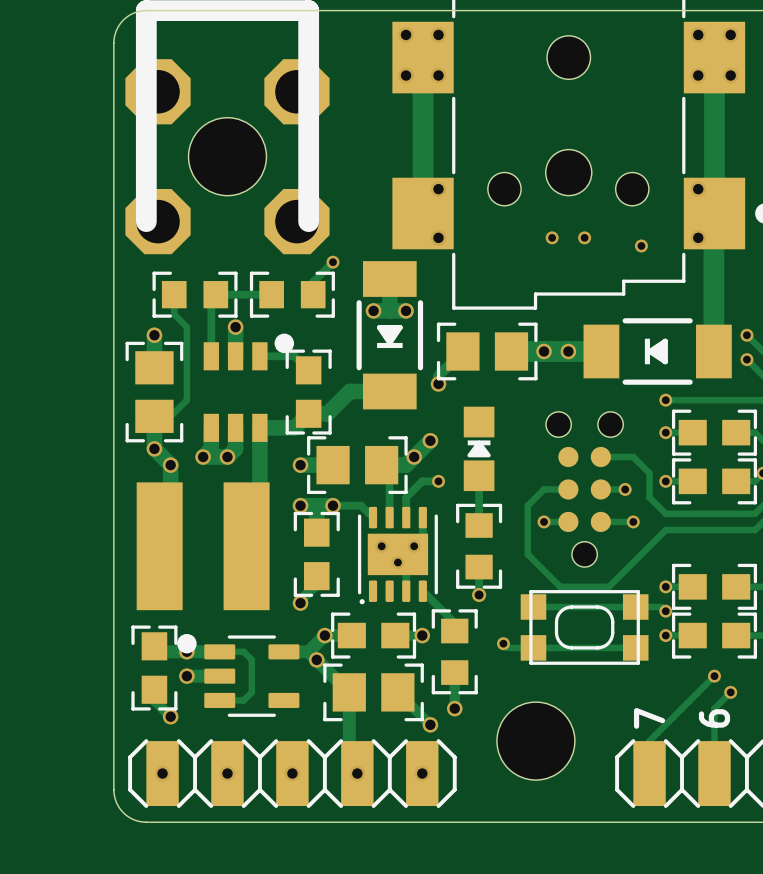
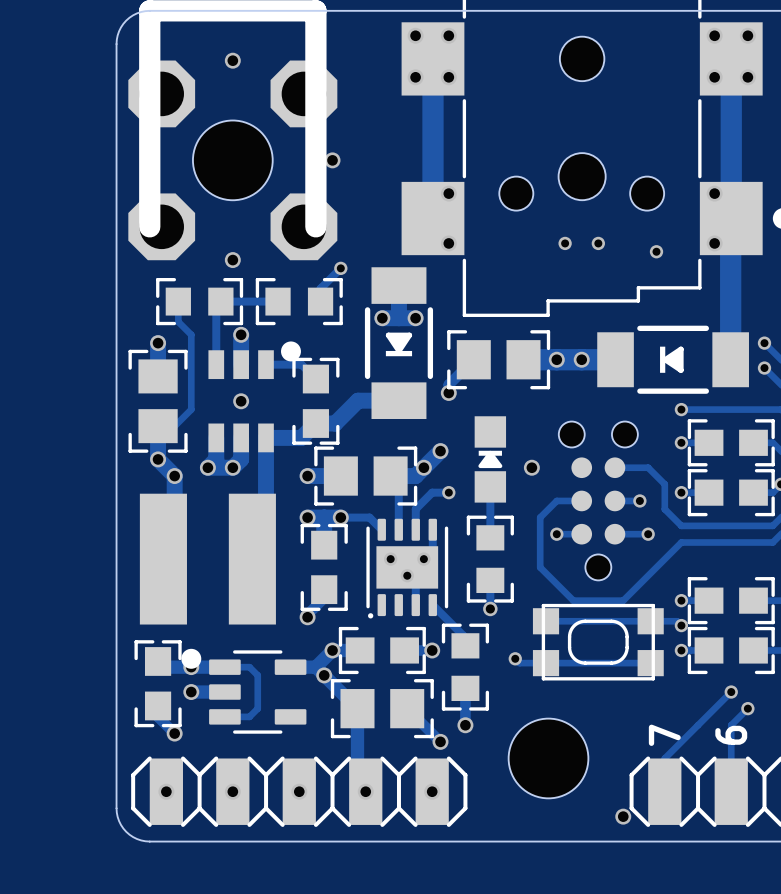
via: none -> (232, 60)
via: none -> (332, 160)
via: none -> (232, 260)
via: none -> (241, 401)
via: none -> (531, 467)
via: none -> (623, 816)

